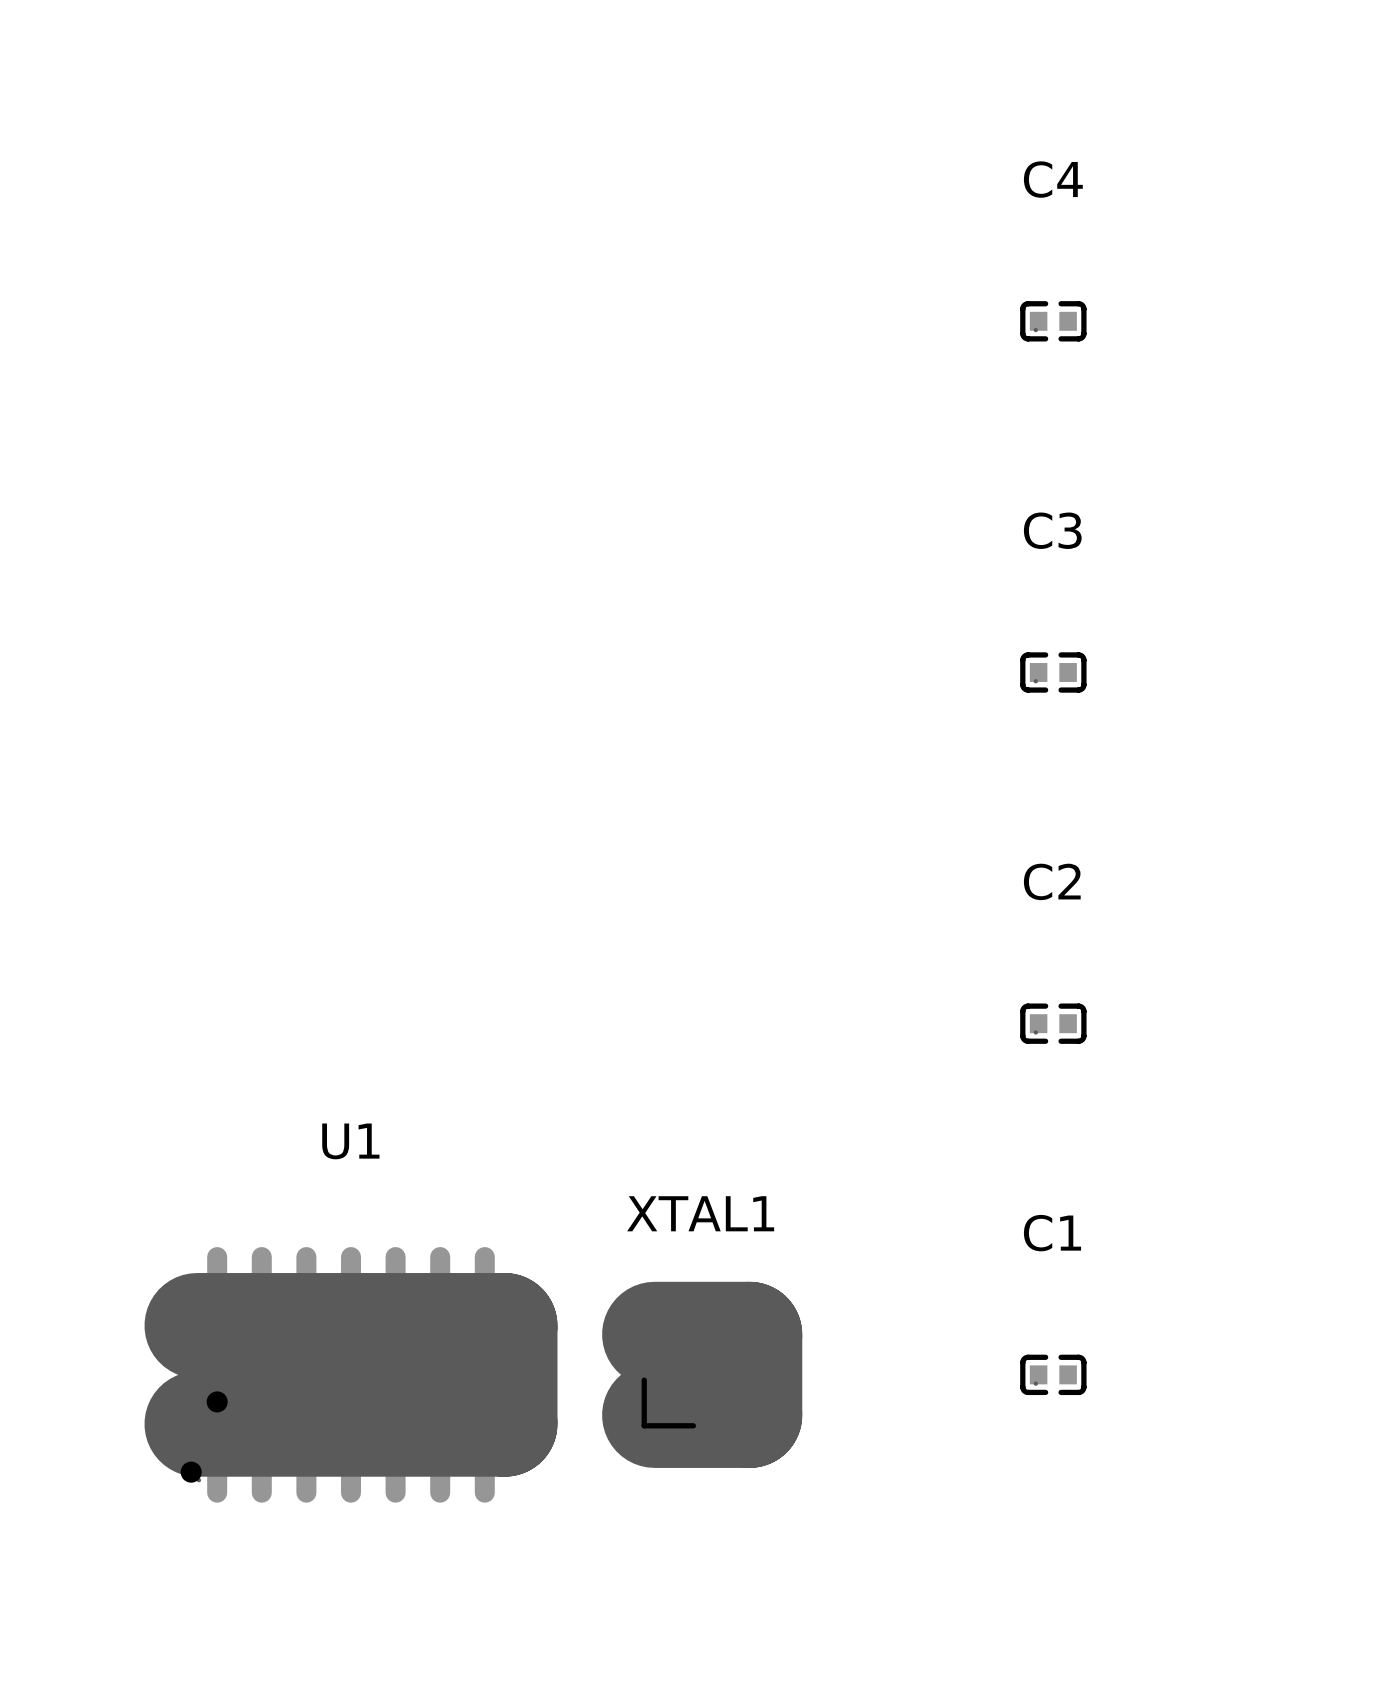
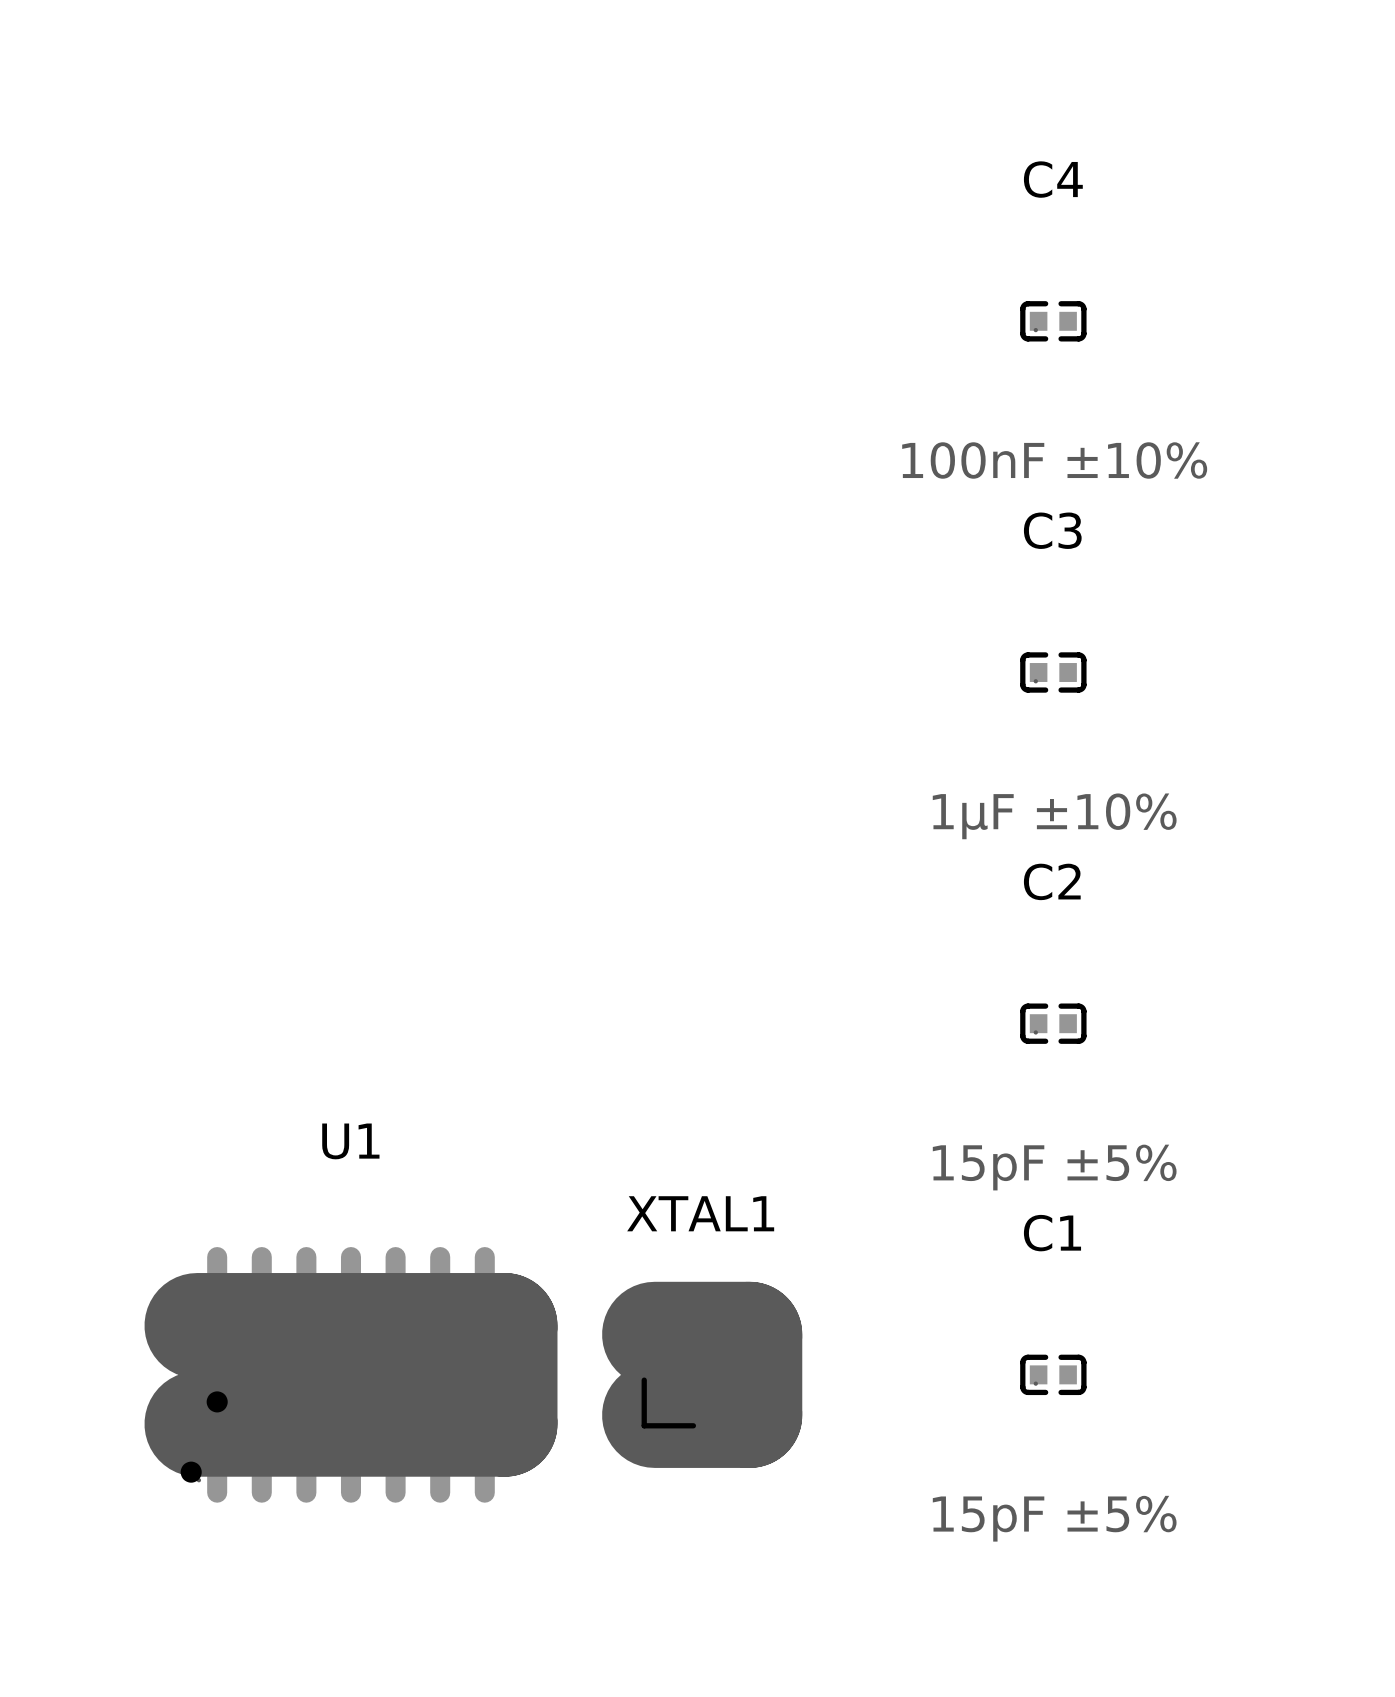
C4 value: none -> 100nF ±10% (1054, 460)
C3 value: none -> 1µF ±10% (1054, 816)
C2 value: none -> 15pF ±5% (1054, 1167)
C1 value: none -> 15pF ±5% (1054, 1518)

